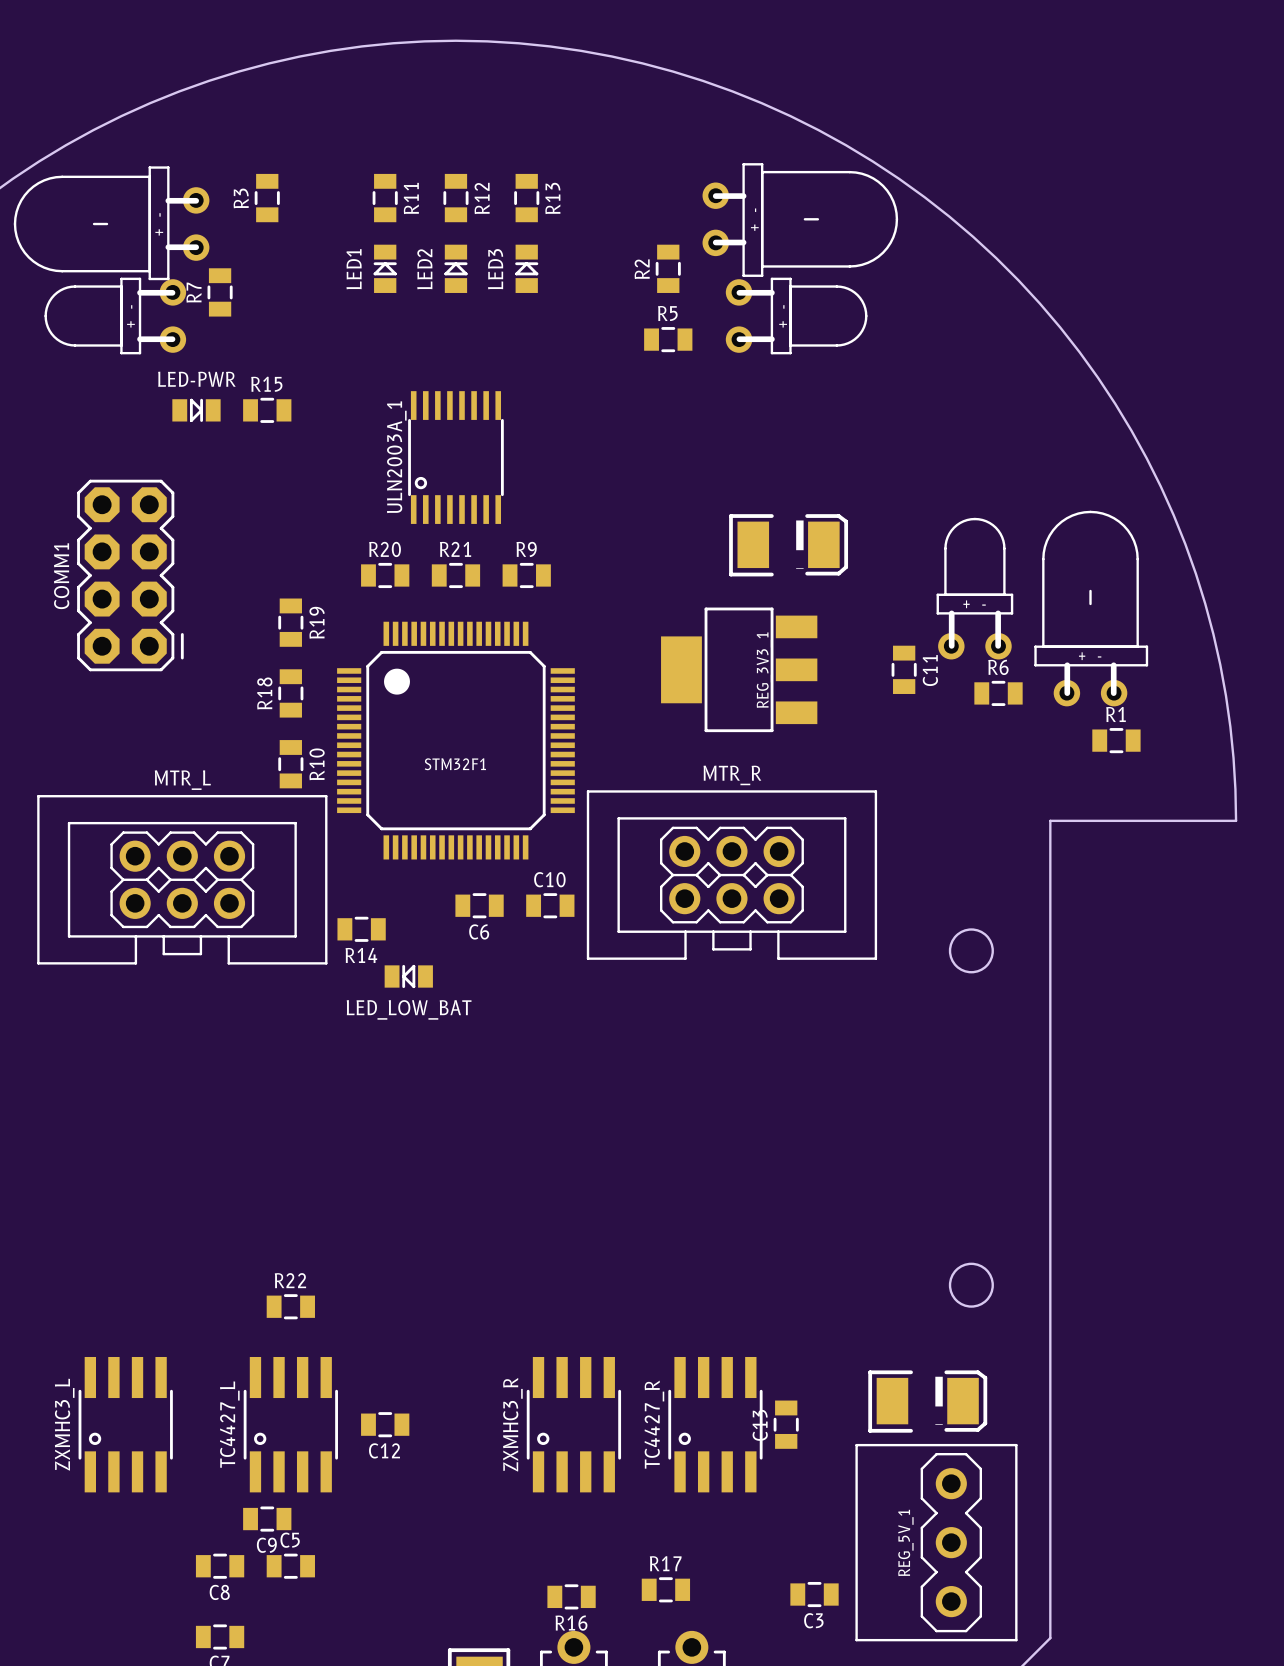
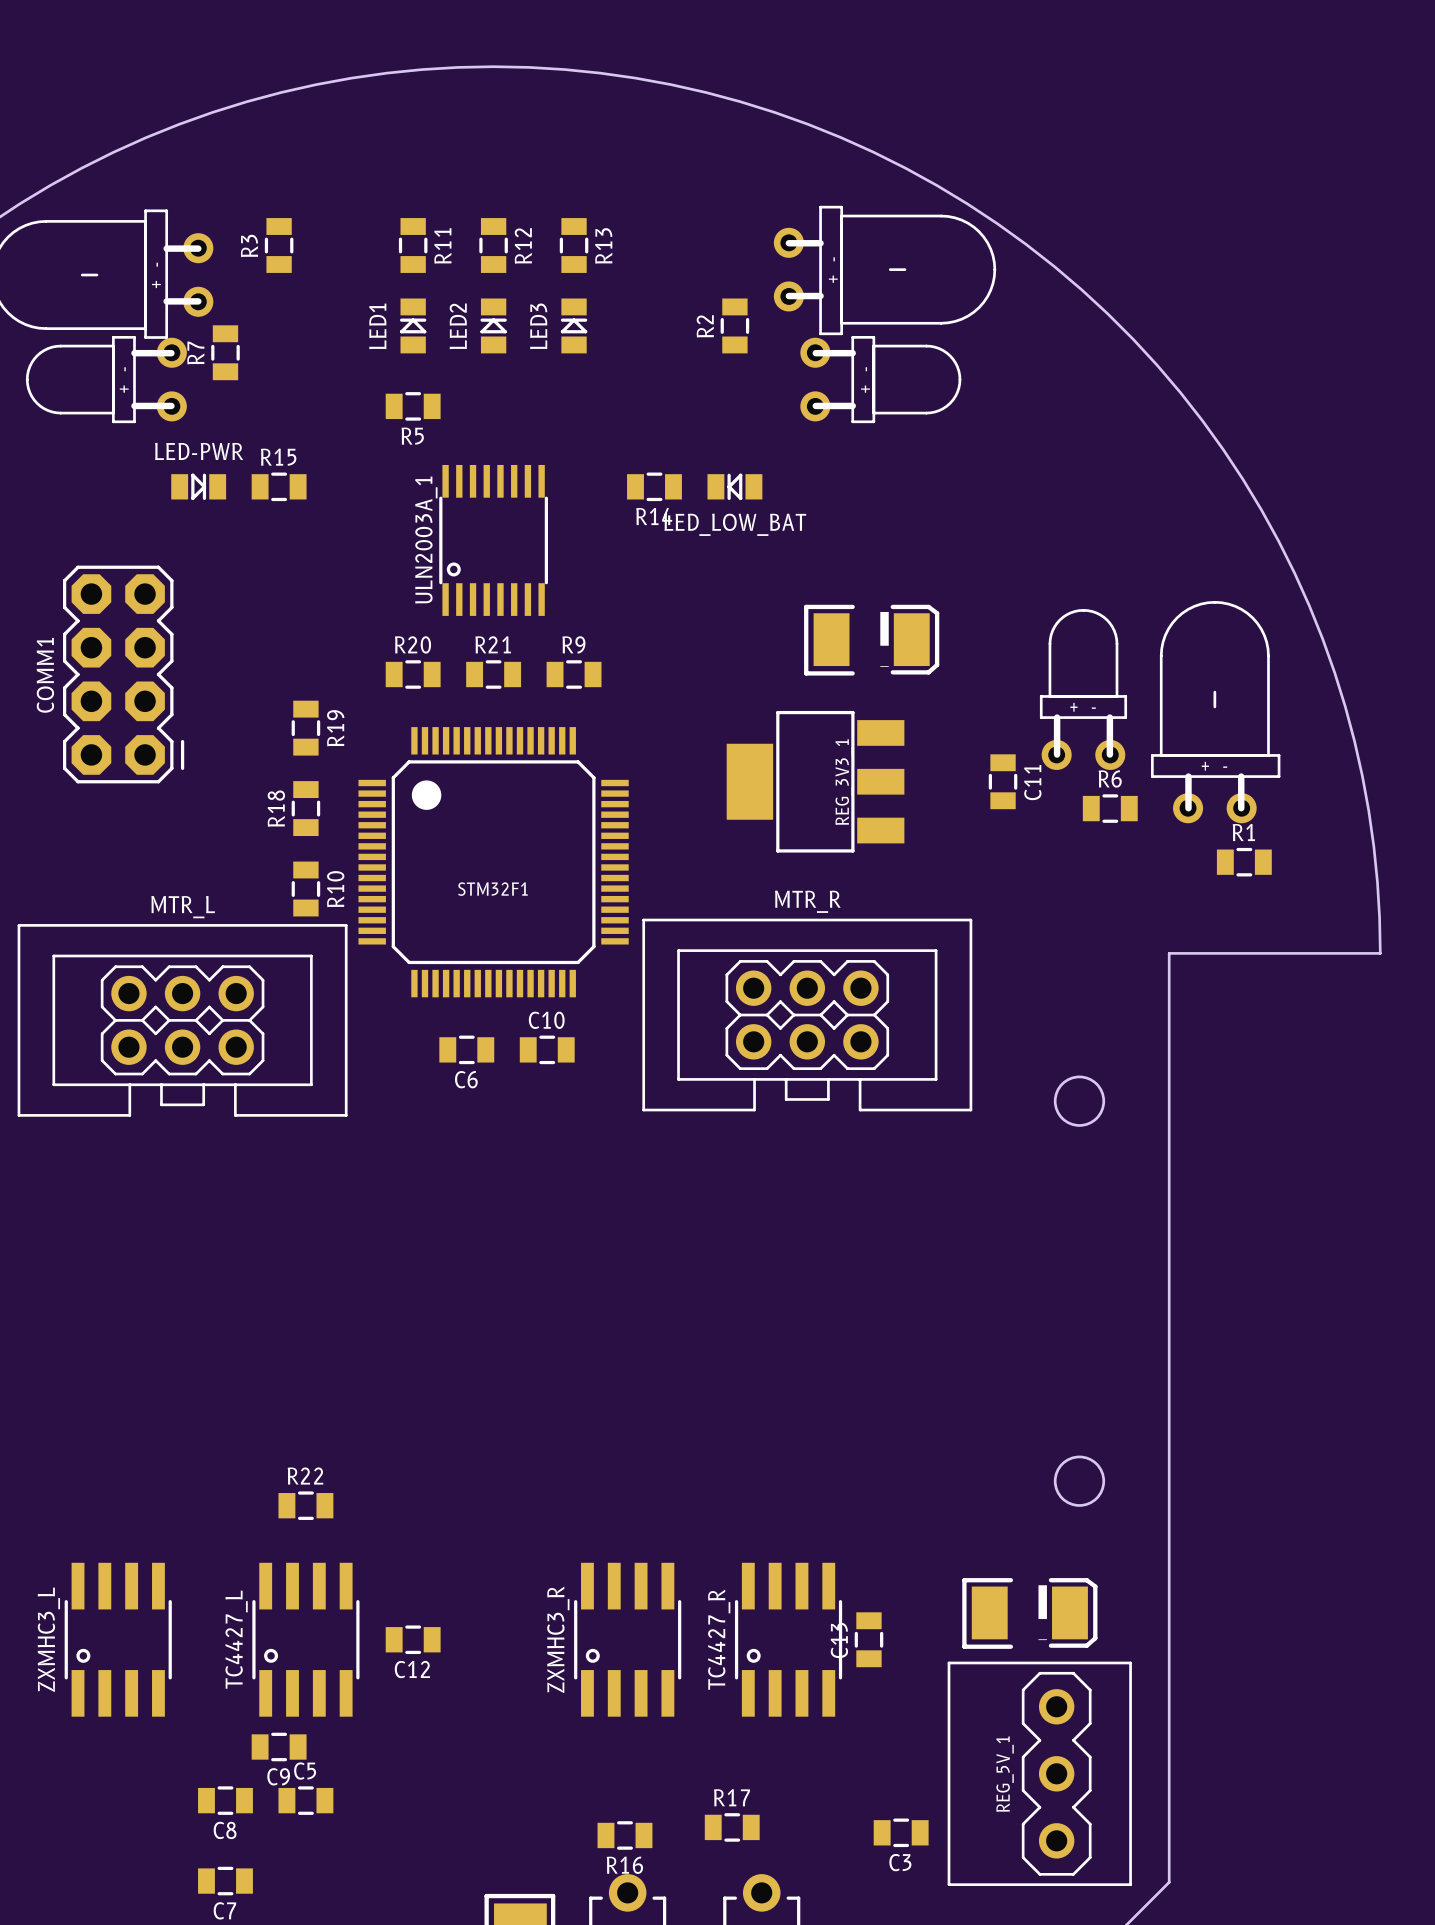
R5 name position: R5 (667, 313) -> R5 (412, 436)
R5 position: (668, 339) -> (413, 406)
LED_LOW_BAT: none -> (734, 486)
C6 position: (479, 905) -> (466, 1049)
C10 position: (550, 905) -> (547, 1049)
R14 position: (361, 929) -> (654, 486)
LED_LOW_BAT: (408, 976) -> none

